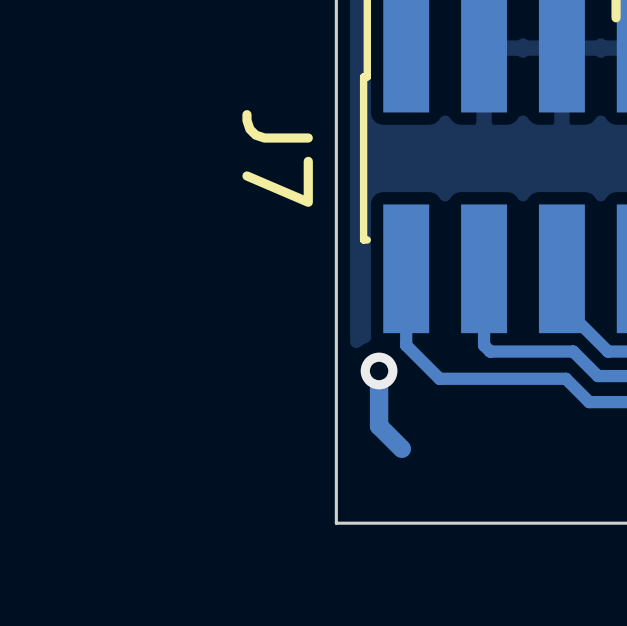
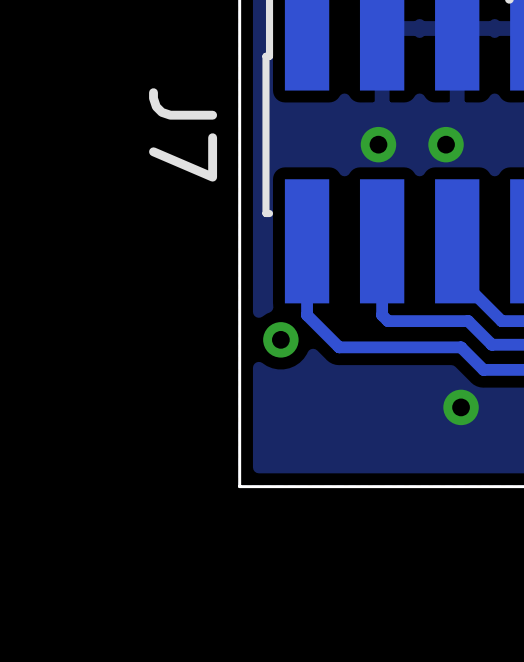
via: none -> (378, 144)
via: none -> (446, 144)
track: (379, 370) (379, 426) (401, 448) -> none
via: none -> (461, 407)

